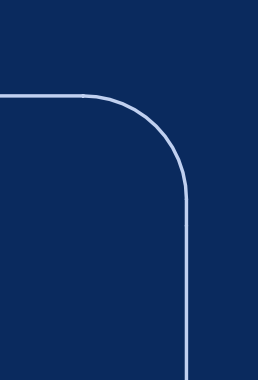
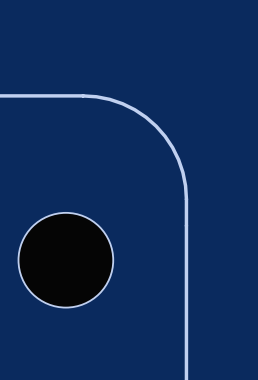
part: none -> (65, 260)

